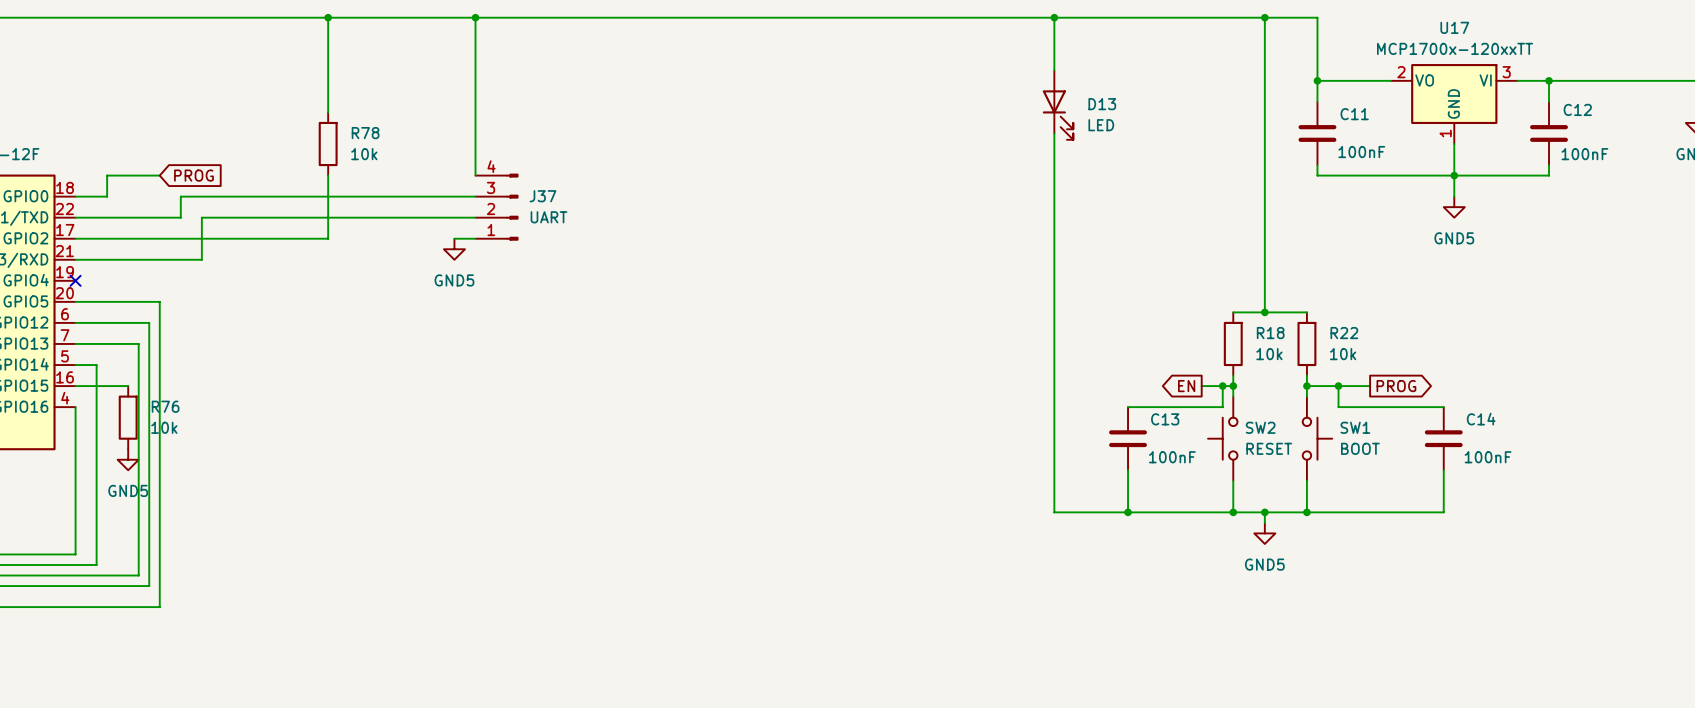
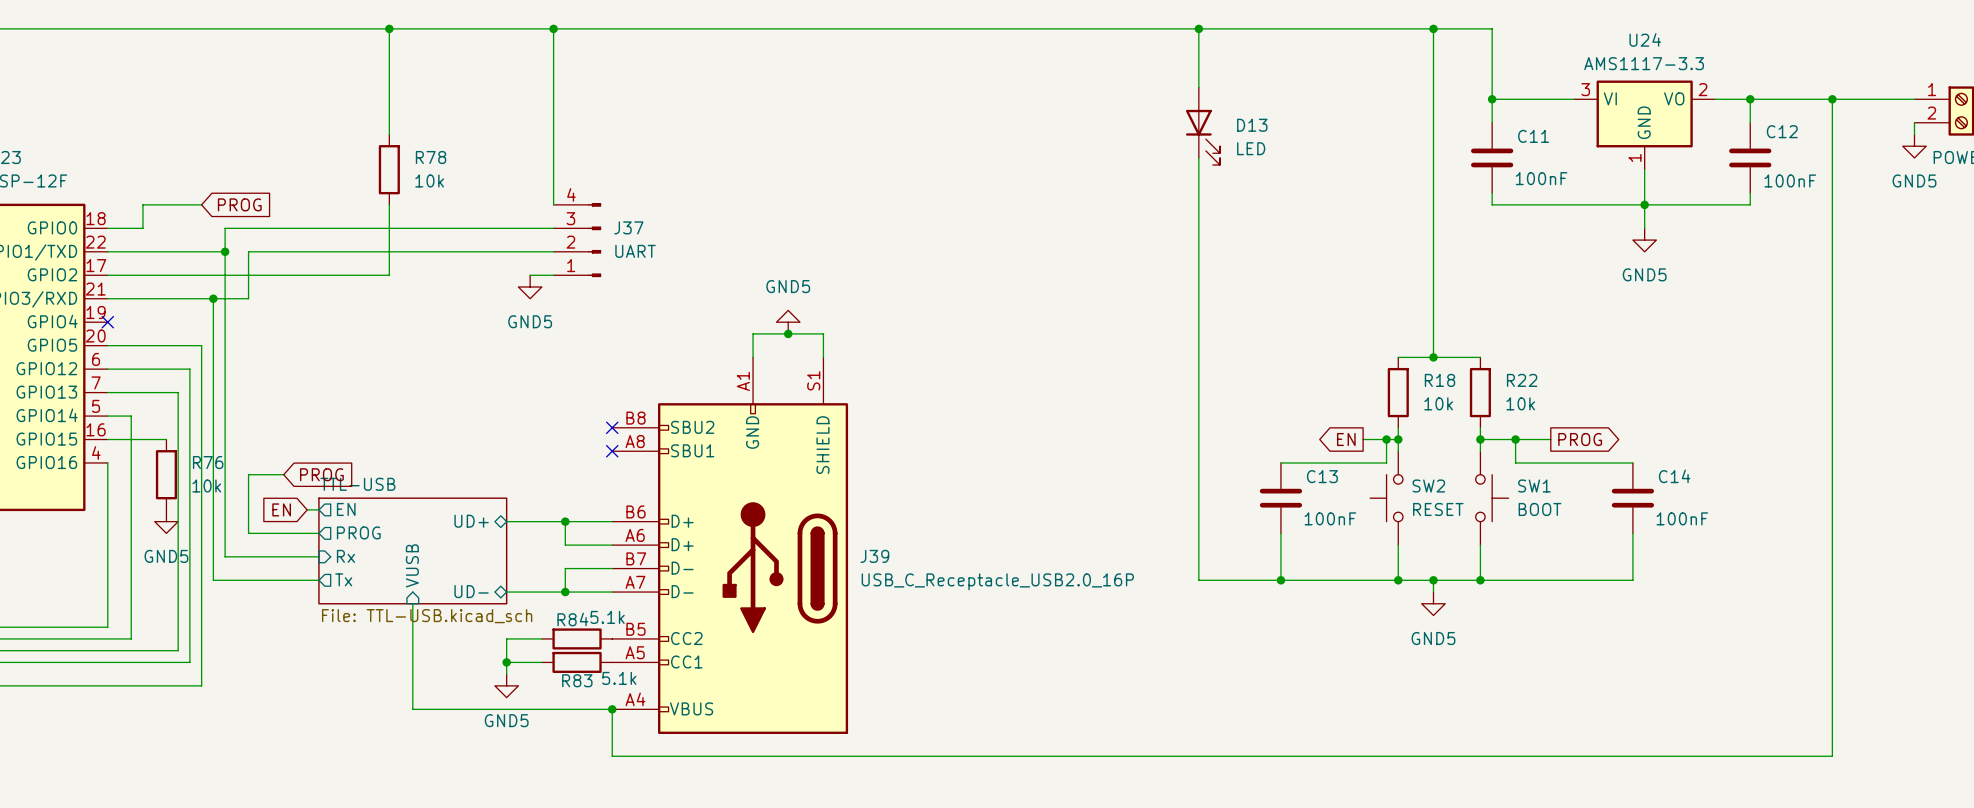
U17 name: U17 (1454, 27) -> U24 (1645, 39)
U17 value: MCP1700x-120xxTT (1455, 48) -> AMS1117-3.3 (1644, 63)
wire: none -> (1832, 99) (1832, 756) (612, 756) (612, 709) (412, 709) (412, 603)
junction: none -> (1832, 99)
U17 flip: as is (1454, 94) -> left-right (1644, 113)
wire: none -> (225, 251) (225, 556) (318, 556)
junction: none -> (225, 251)
wire: none -> (213, 298) (213, 580) (318, 580)
junction: none -> (213, 298)
power symbol: none -> GND5 (788, 322)
junction: none -> (788, 333)
wire: none -> (753, 357) (753, 333) (823, 333) (823, 357)
no-connect mark: none -> (612, 427)
no-connect mark: none -> (612, 451)
wire: none -> (283, 474) (248, 474) (248, 533) (318, 533)
global label: none -> PROG (321, 474)
sheet pin: none -> EN (346, 509)
global label: none -> EN (281, 509)
wire: none -> (307, 509) (318, 509)
sheet pin: none -> UD+ (471, 521)
wire: none -> (506, 521) (612, 521)
wire: none -> (565, 521) (565, 545) (612, 545)
junction: none -> (565, 521)
sheet pin: none -> PROG (358, 532)
J39: none -> USB_C_Receptacle_USB2.0_16P (730, 545)
sheet TTL-USB: none -> File: TTL-USB.kicad_sch (412, 550)
sheet pin: none -> Rx (345, 556)
sheet pin: none -> VUSB (412, 565)
wire: none -> (612, 568) (565, 568) (565, 592)
sheet pin: none -> Tx (343, 579)
sheet pin: none -> UD- (471, 591)
wire: none -> (506, 592) (612, 592)
junction: none -> (565, 592)
wire: none -> (541, 638) (506, 638) (506, 674)
R84: none -> 5.1k (577, 638)
wire: none -> (506, 662) (541, 662)
junction: none -> (506, 662)
R83: none -> 5.1k (577, 662)
power symbol: none -> GND5 (506, 685)
junction: none -> (612, 709)

